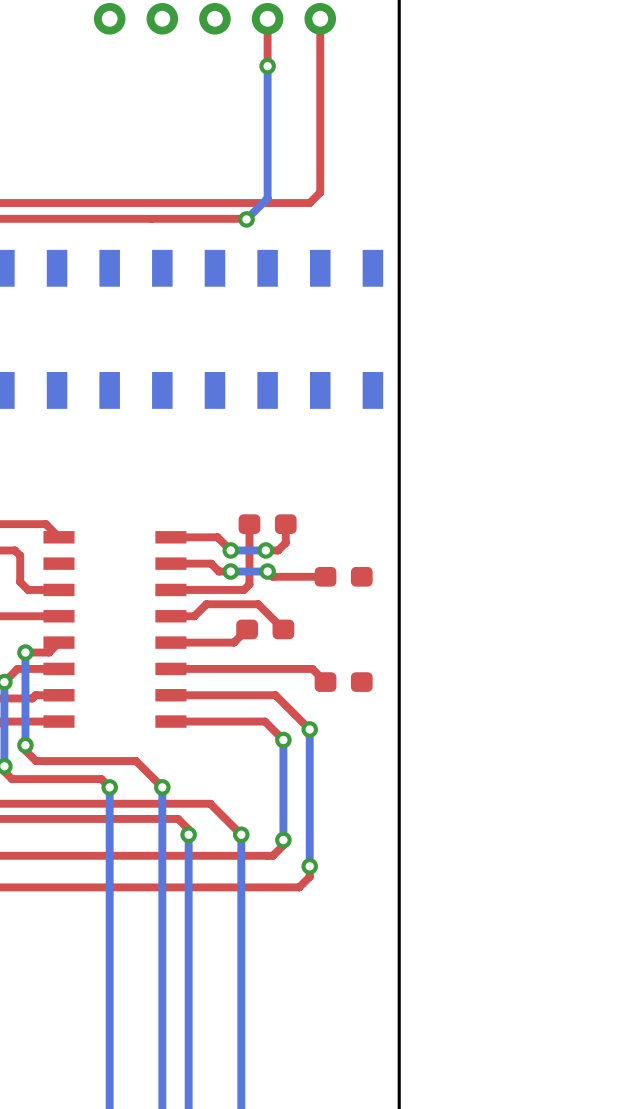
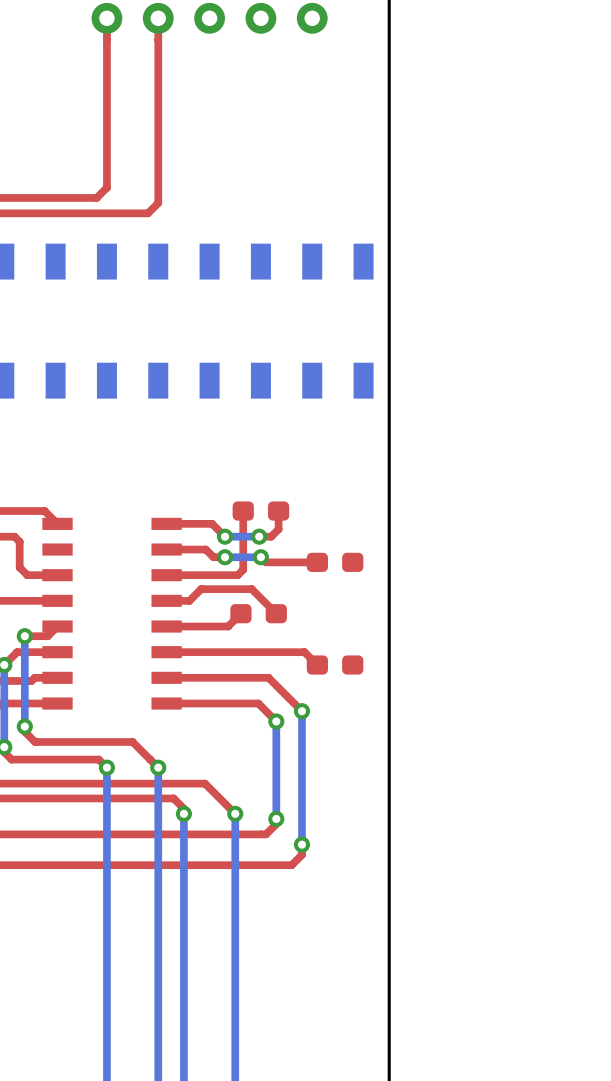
top track: (267, 18) (267, 66) -> none
top track: (320, 18) (320, 192) (309, 203) (99, 203) -> (106, 18) (106, 187) (96, 197)
bottom track: (267, 66) (267, 198) (246, 219) -> none
via: (267, 66) -> none
top track: (151, 218) (246, 219) -> (148, 213) (158, 203) (158, 18)
via: (246, 219) -> none

